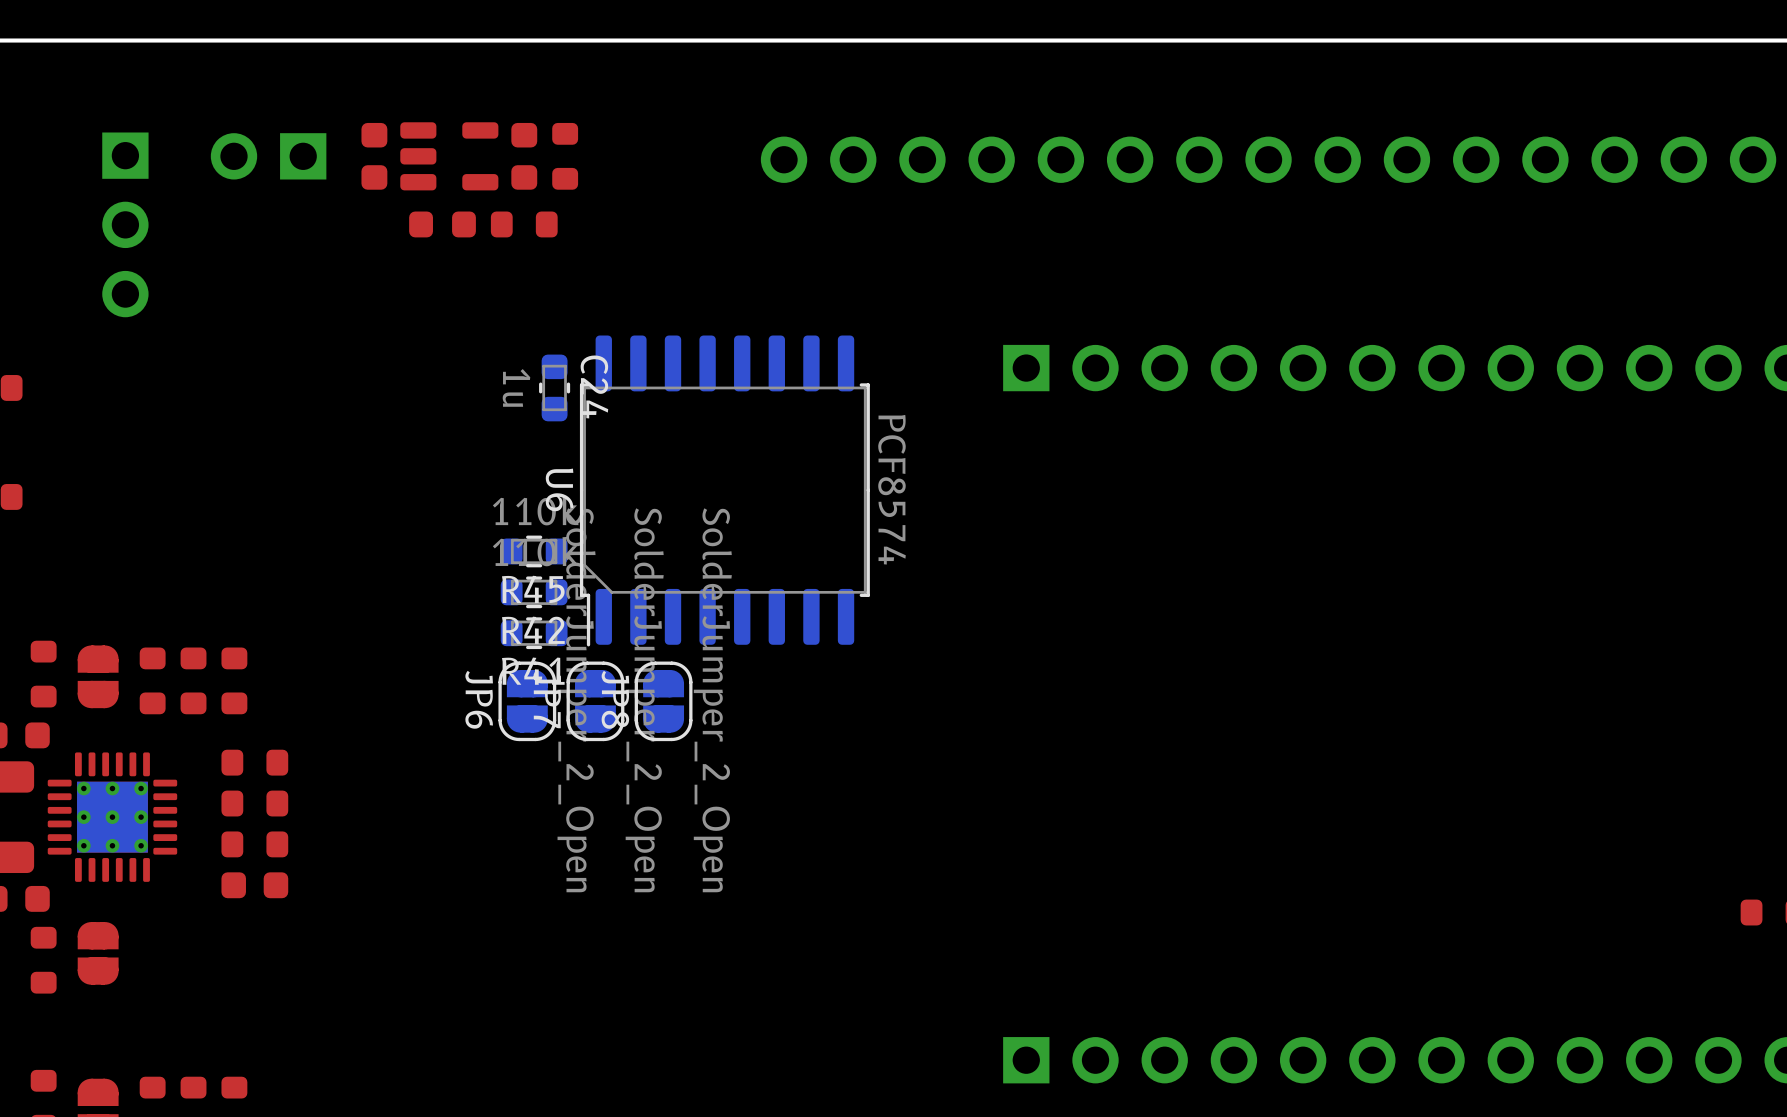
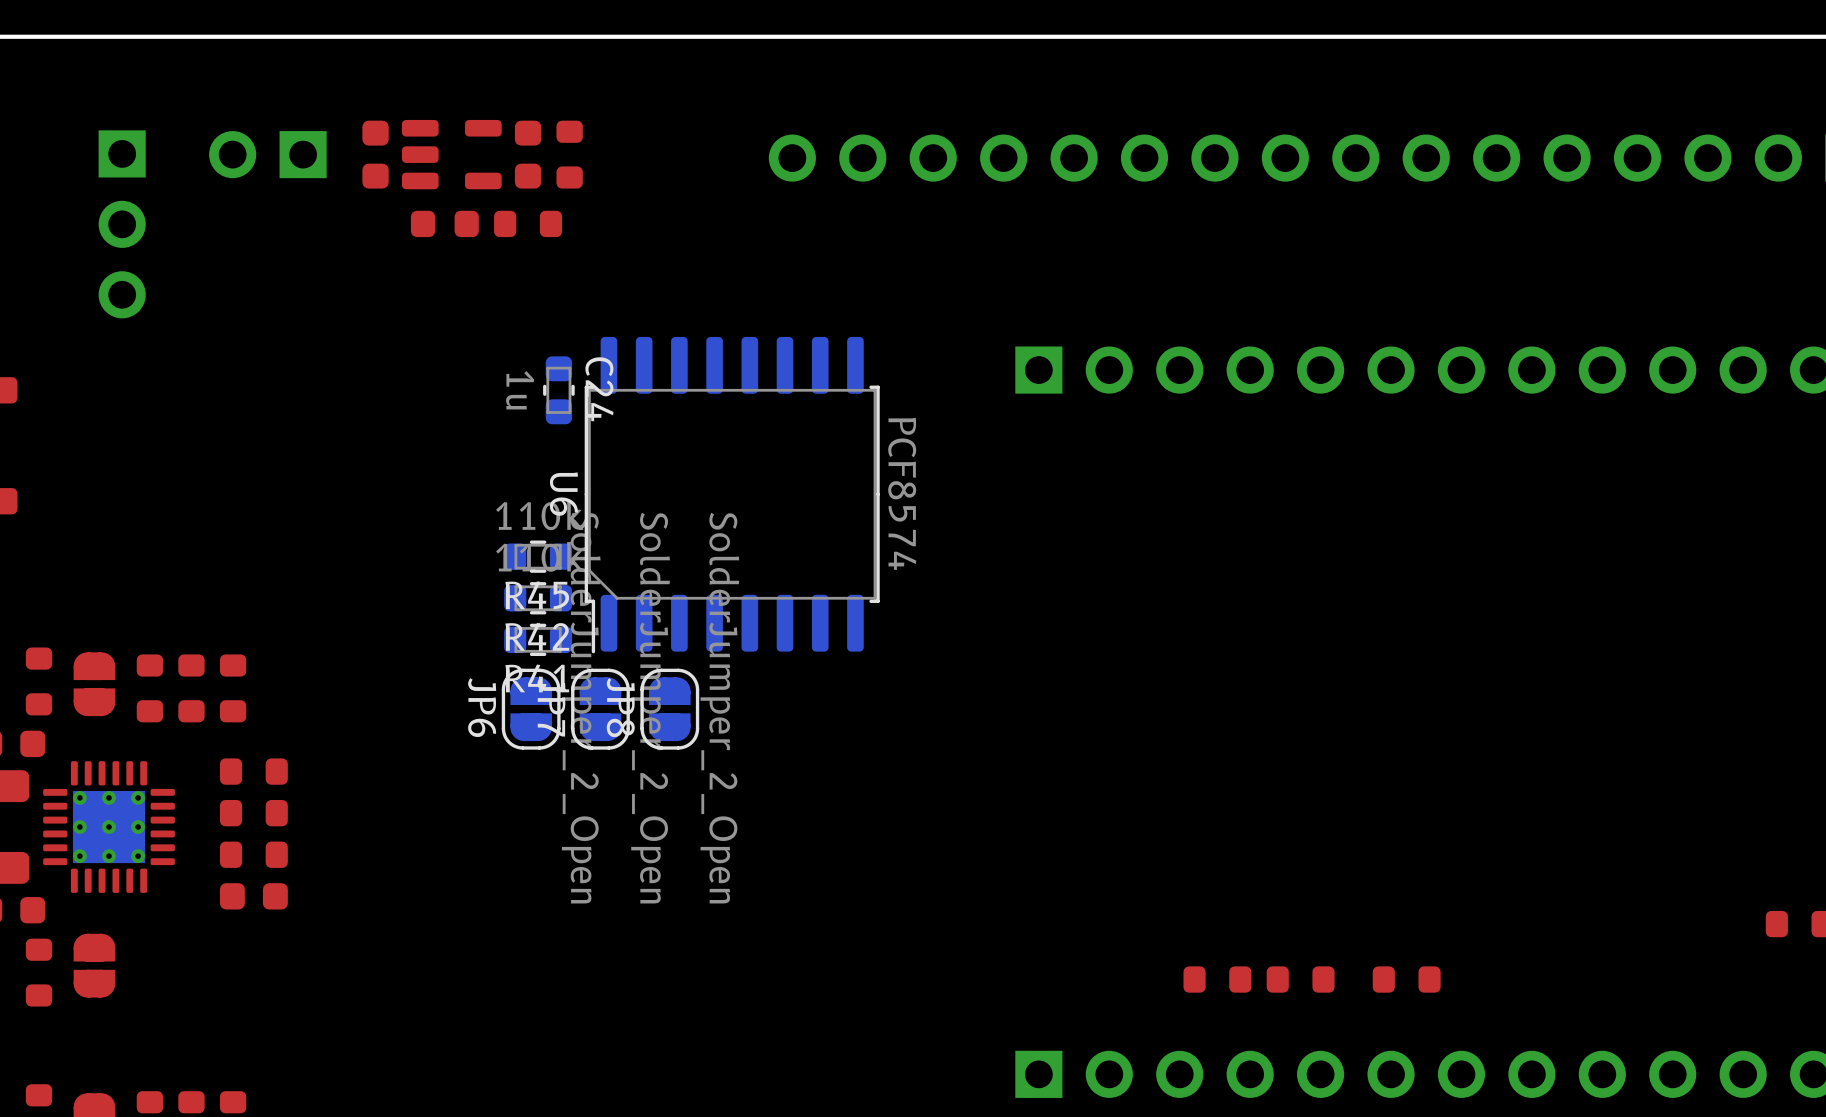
part: none -> (1217, 979)
part: none -> (1300, 979)
part: none -> (1406, 979)

